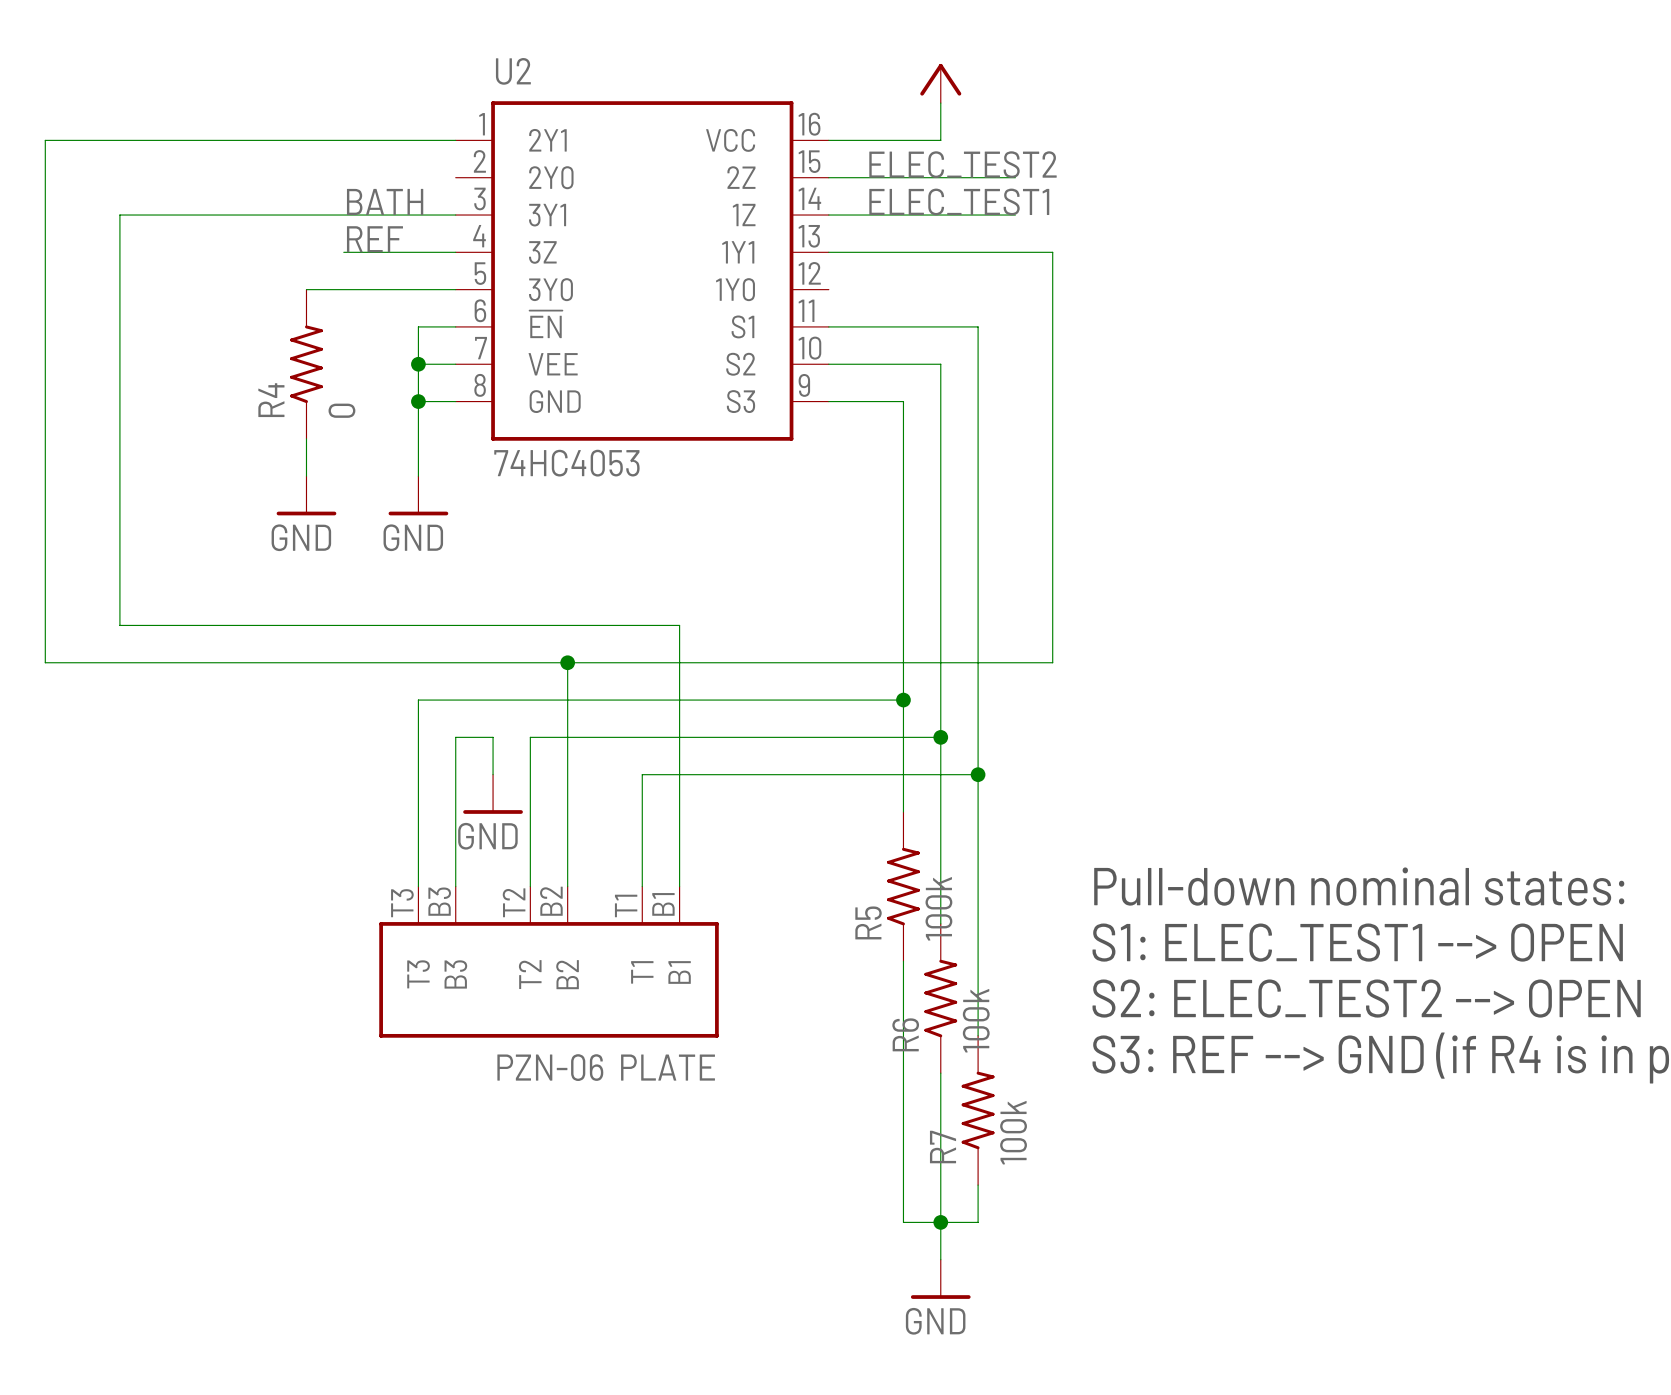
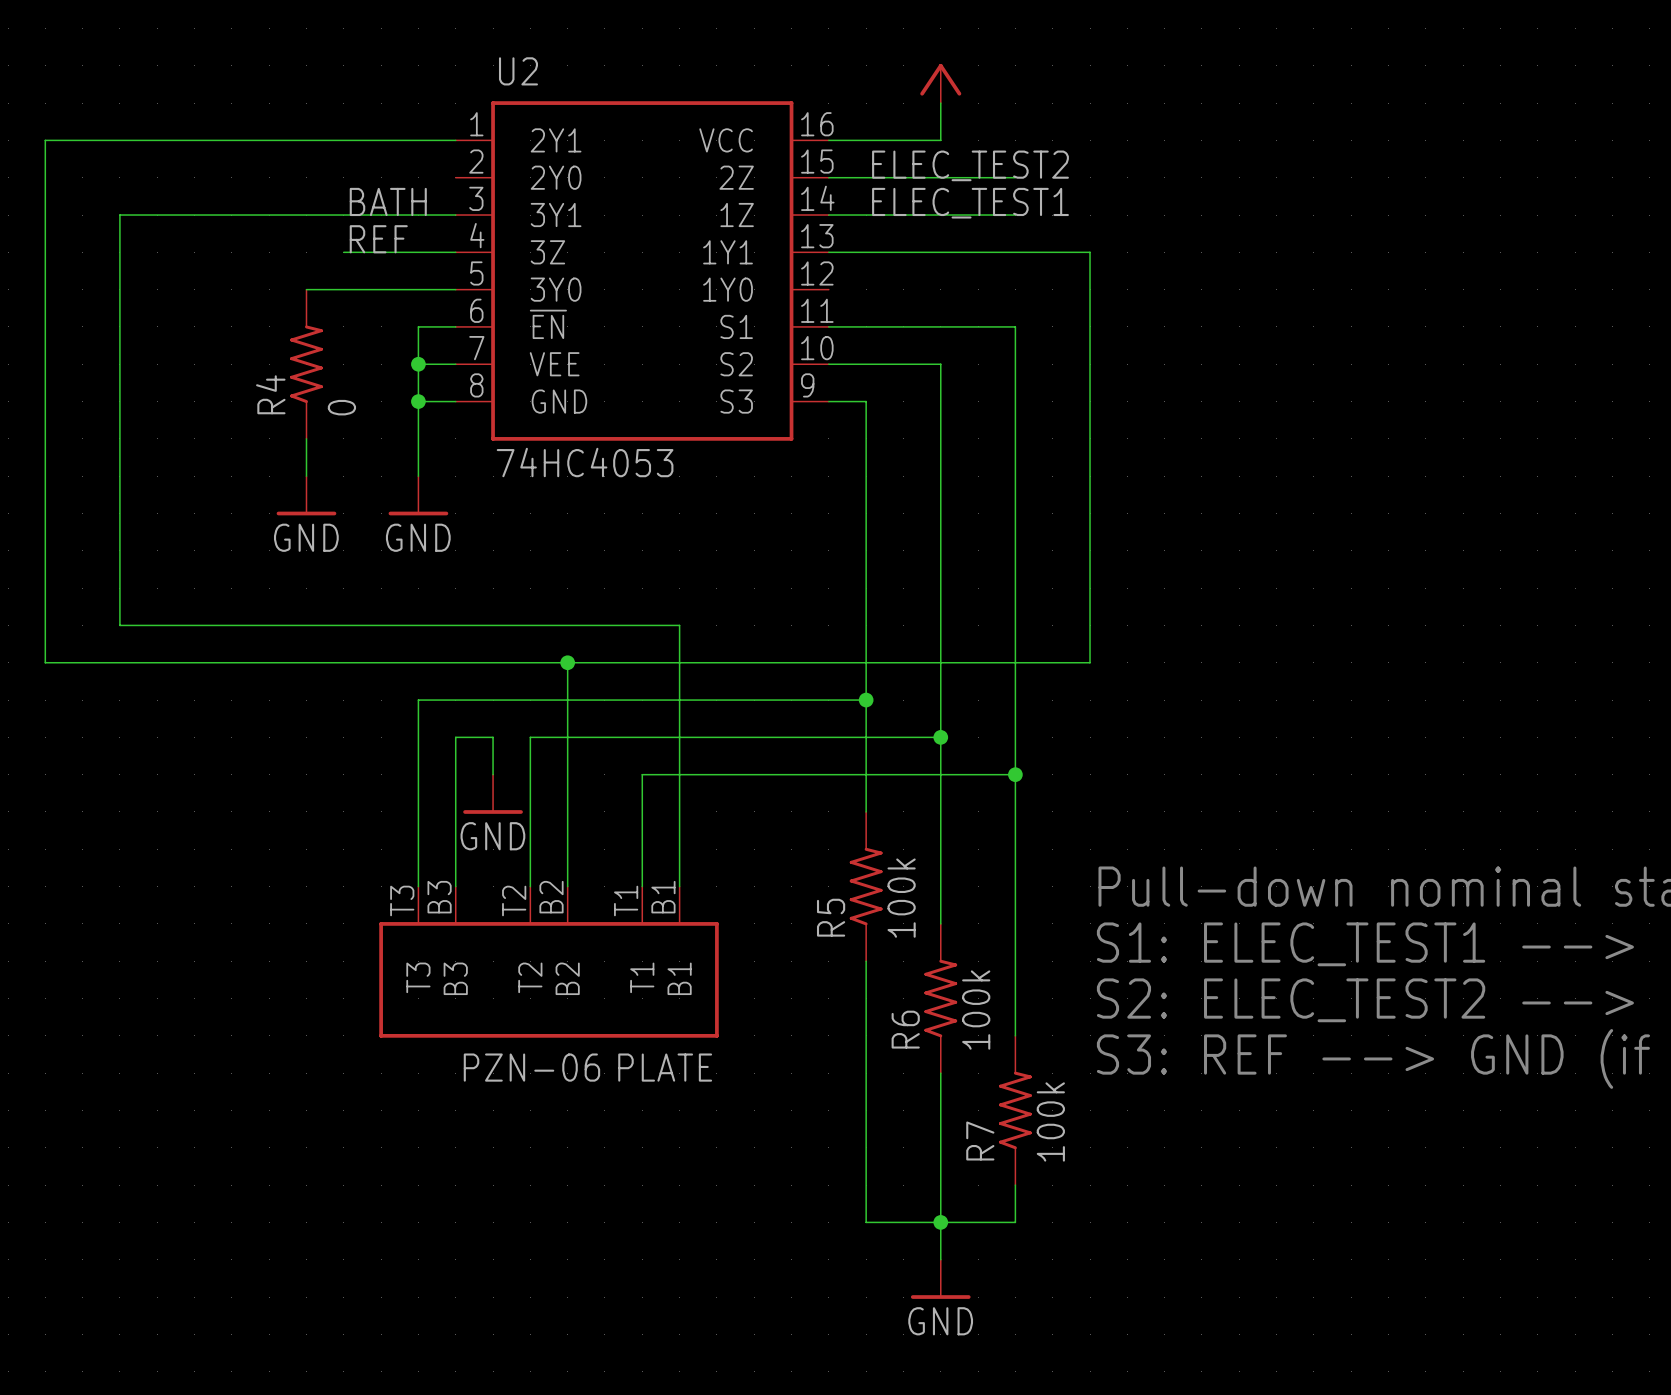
wire: (1052, 252) (1052, 662) -> (1052, 252) (1090, 252) (1090, 662) (1052, 662)
wire: (978, 326) (978, 1035) -> (978, 326) (1015, 326) (1015, 1035)
wire: (866, 401) (903, 401) (903, 811) -> (866, 401) (866, 811)
wire: (866, 700) (903, 700) -> (978, 774) (1015, 774)
junction position: (903, 700) -> (866, 700)
junction position: (978, 774) -> (1015, 774)
R5 position: (903, 886) -> (866, 886)
wire: (903, 961) (903, 1222) -> (866, 961) (866, 1222) (903, 1222)
R7 position: (978, 1110) -> (1015, 1110)
wire: (978, 1185) (978, 1222) -> (1015, 1185) (1015, 1222) (978, 1222)

